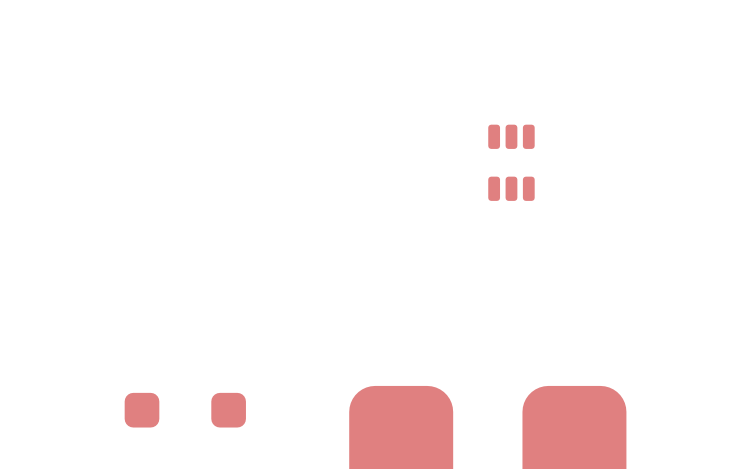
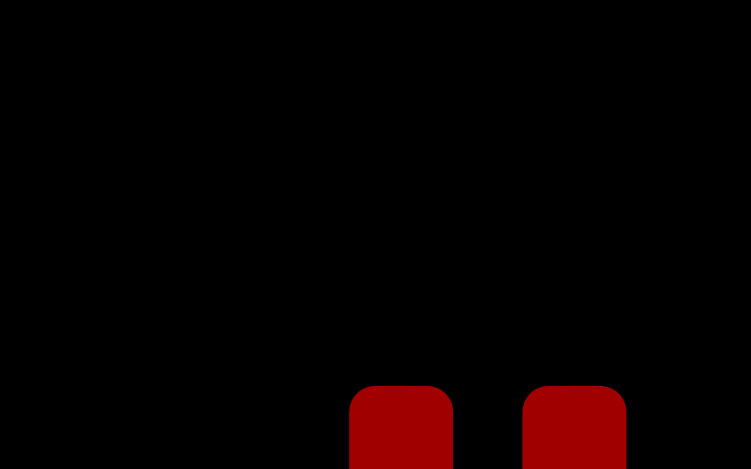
part: (511, 162) -> none
part: (185, 410) -> none

